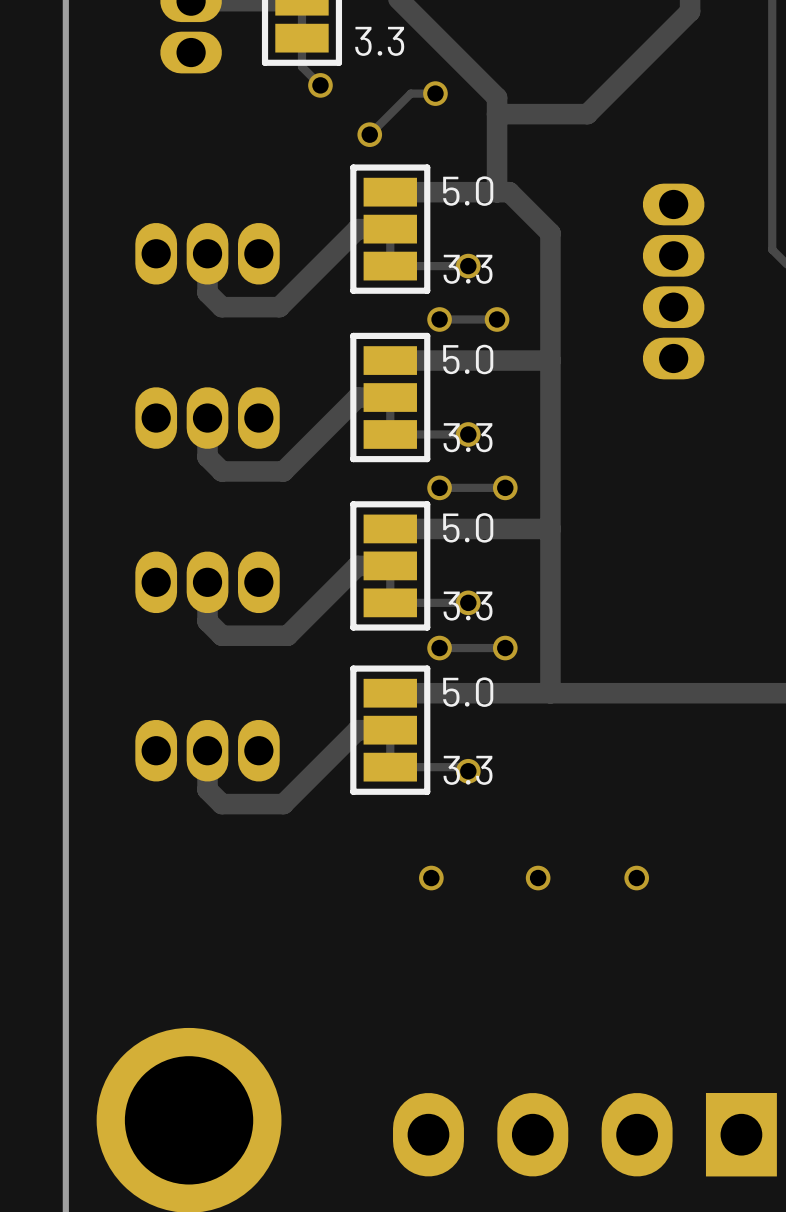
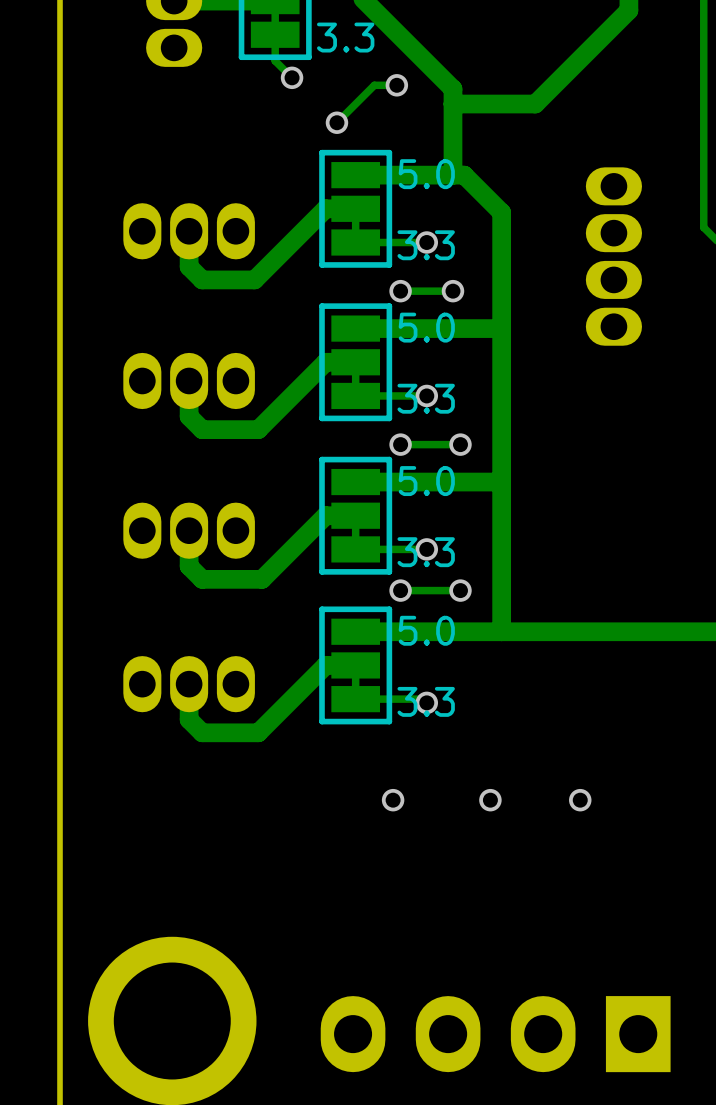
part position: (584, 1134) -> (495, 1034)

